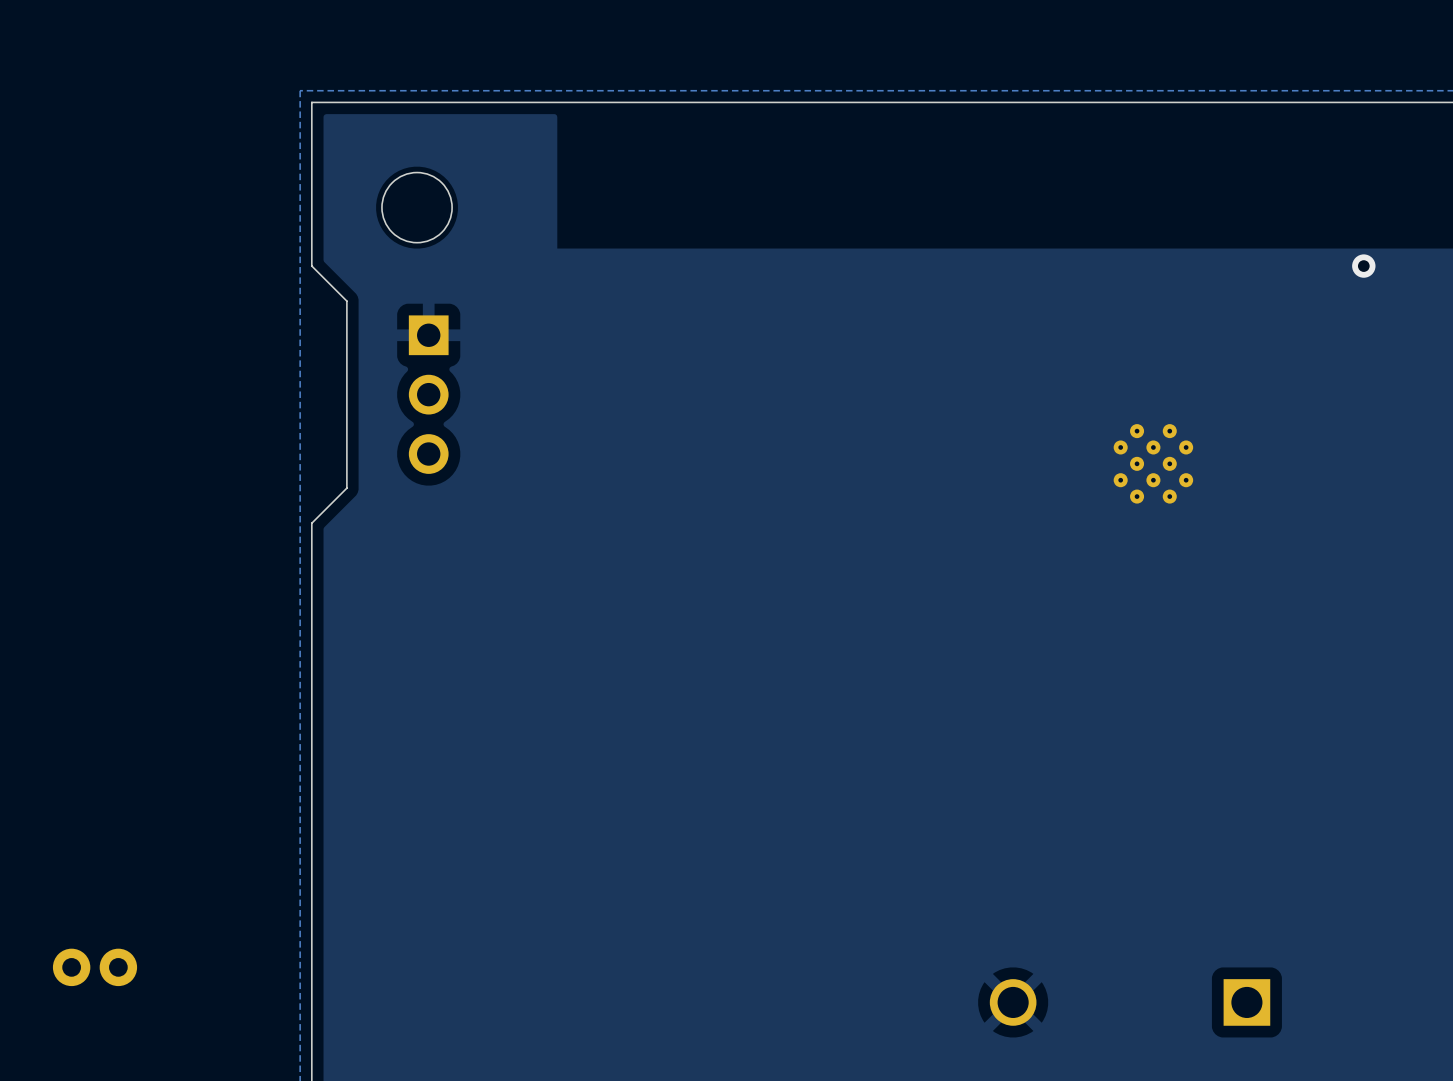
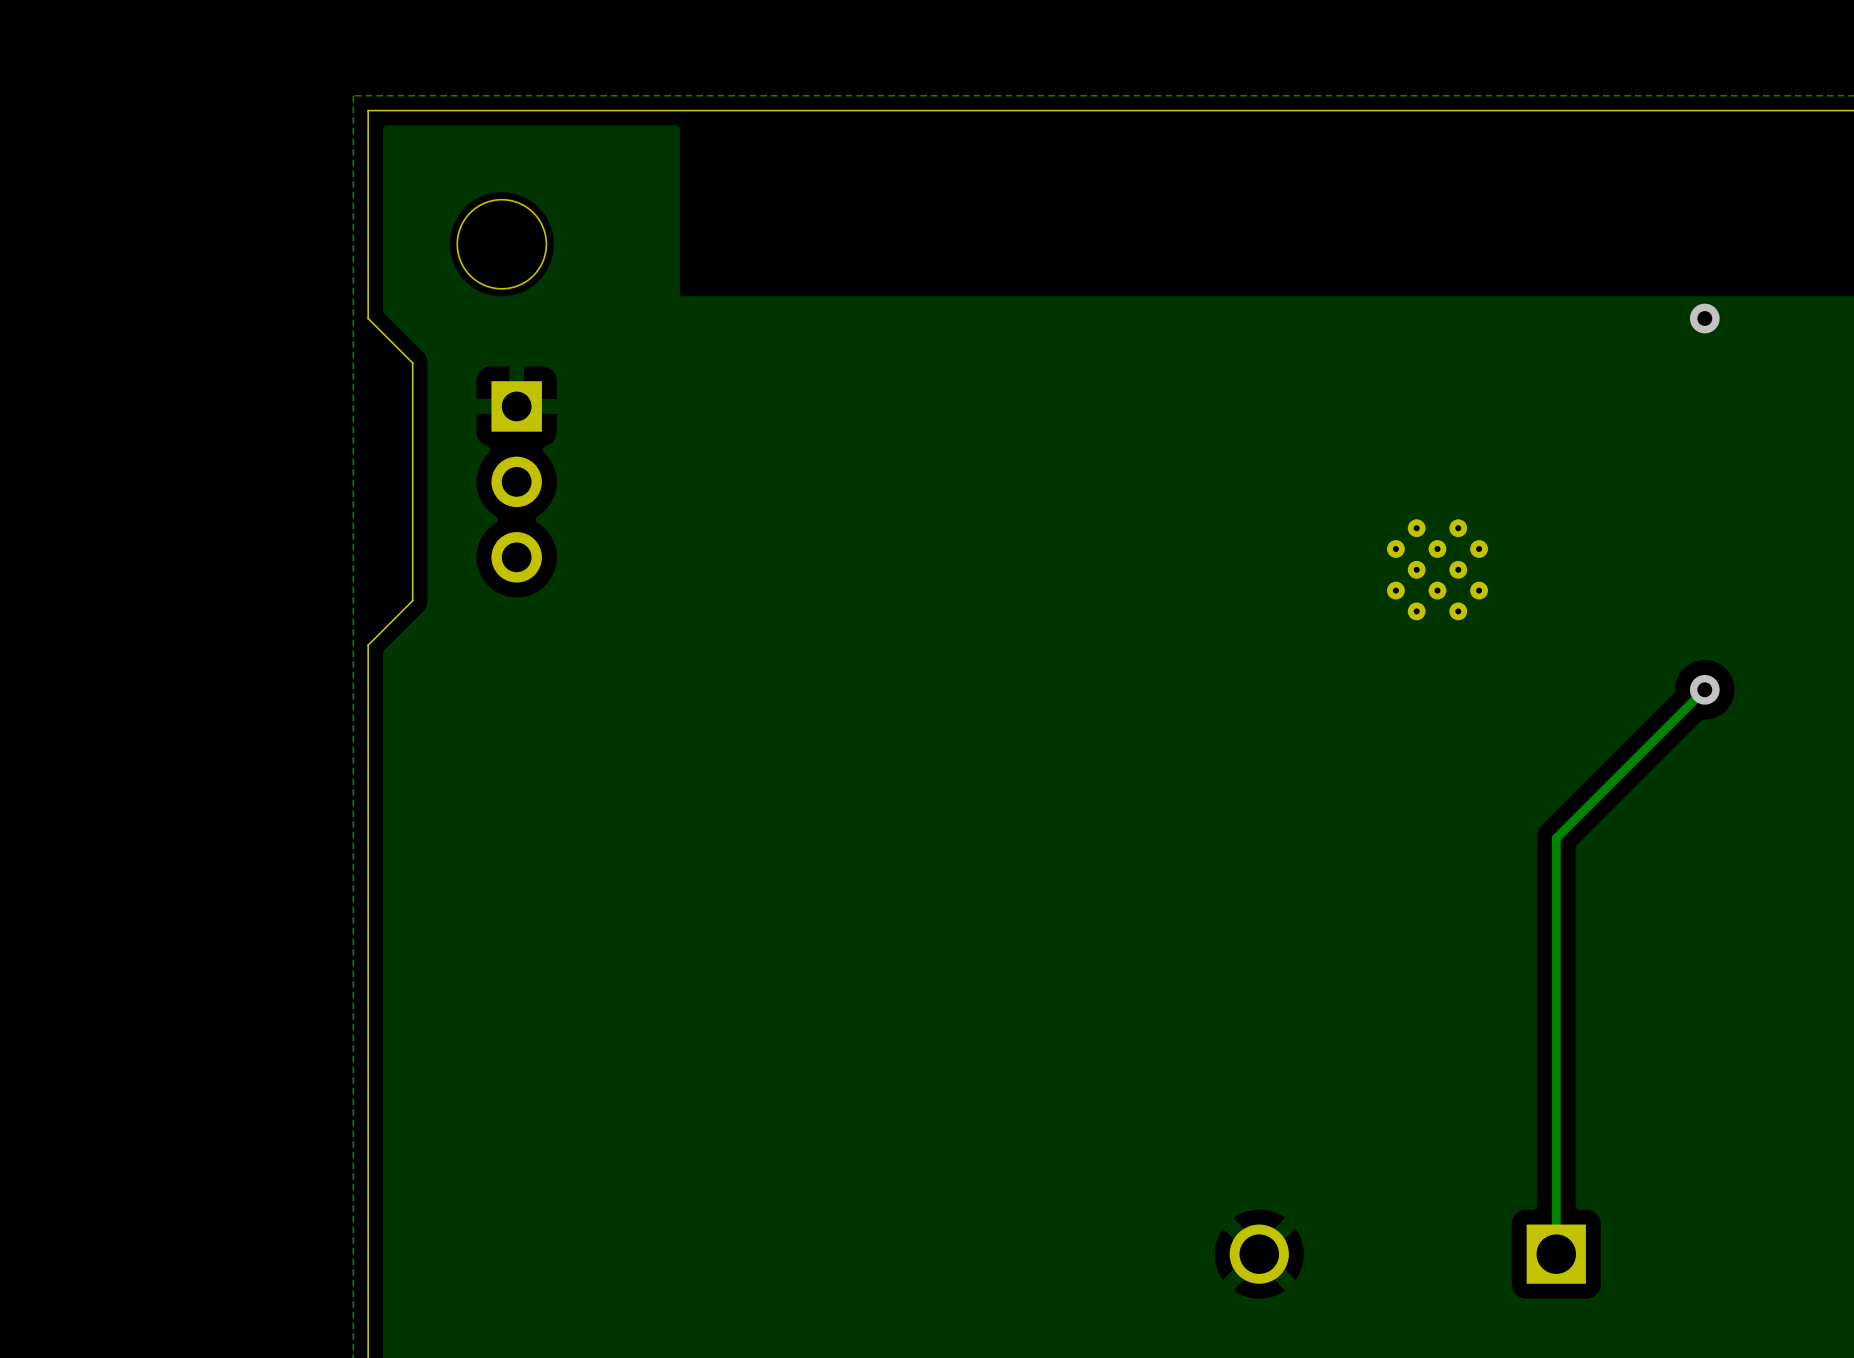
track: none -> (1704, 689) (1556, 838) (1556, 1254)
via: none -> (1704, 689)
part: (95, 967) -> none

